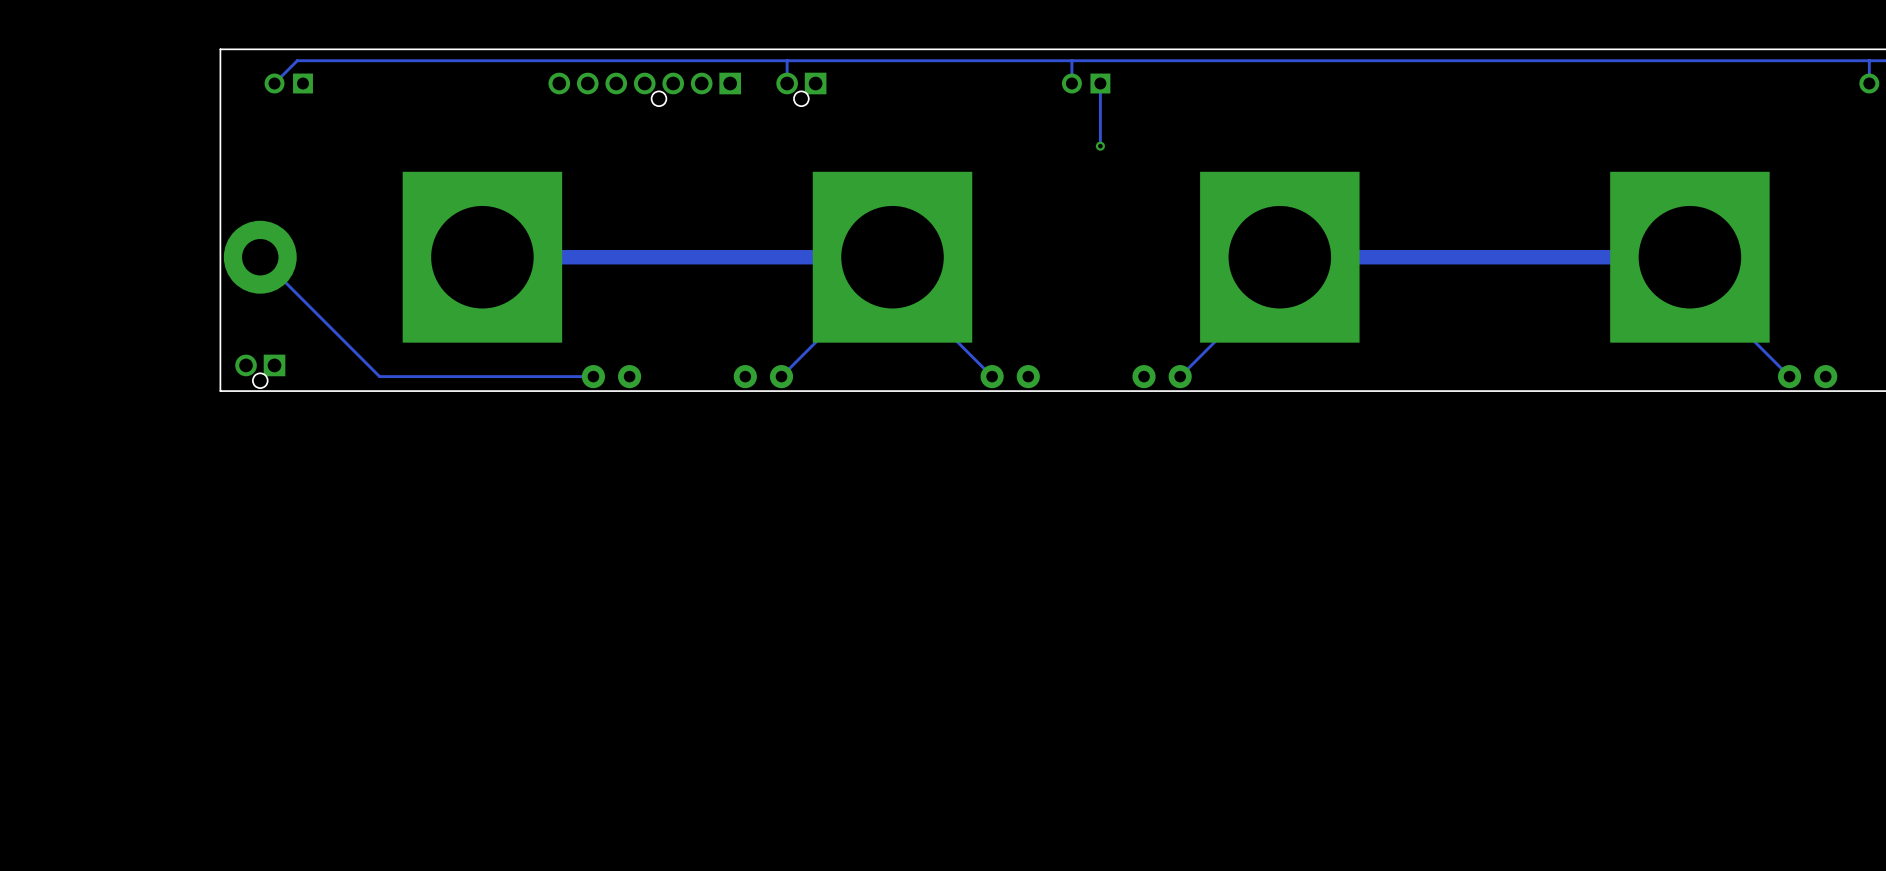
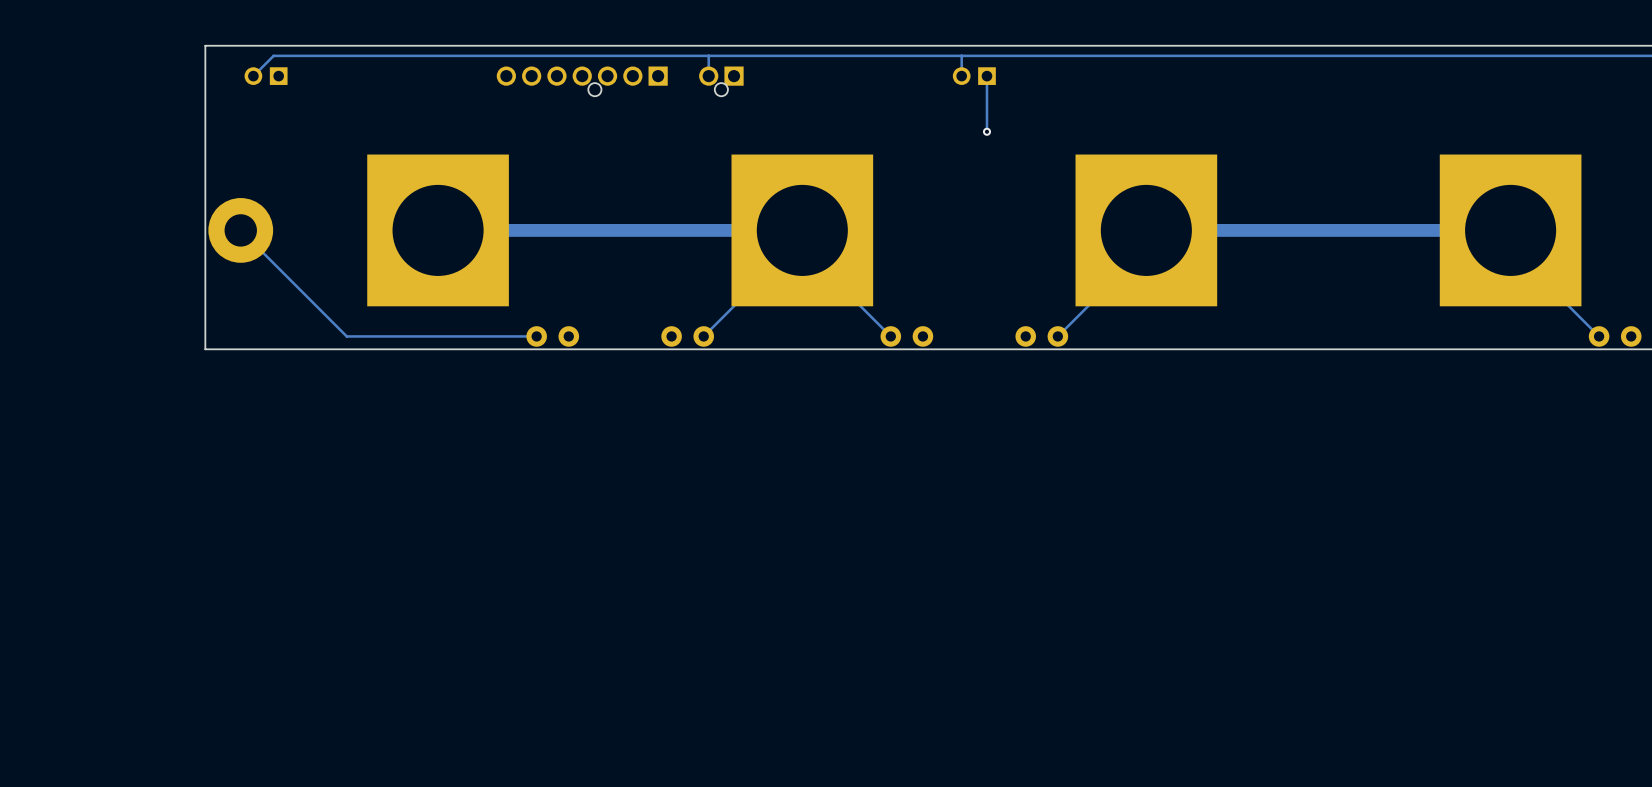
part: (260, 371) -> none

